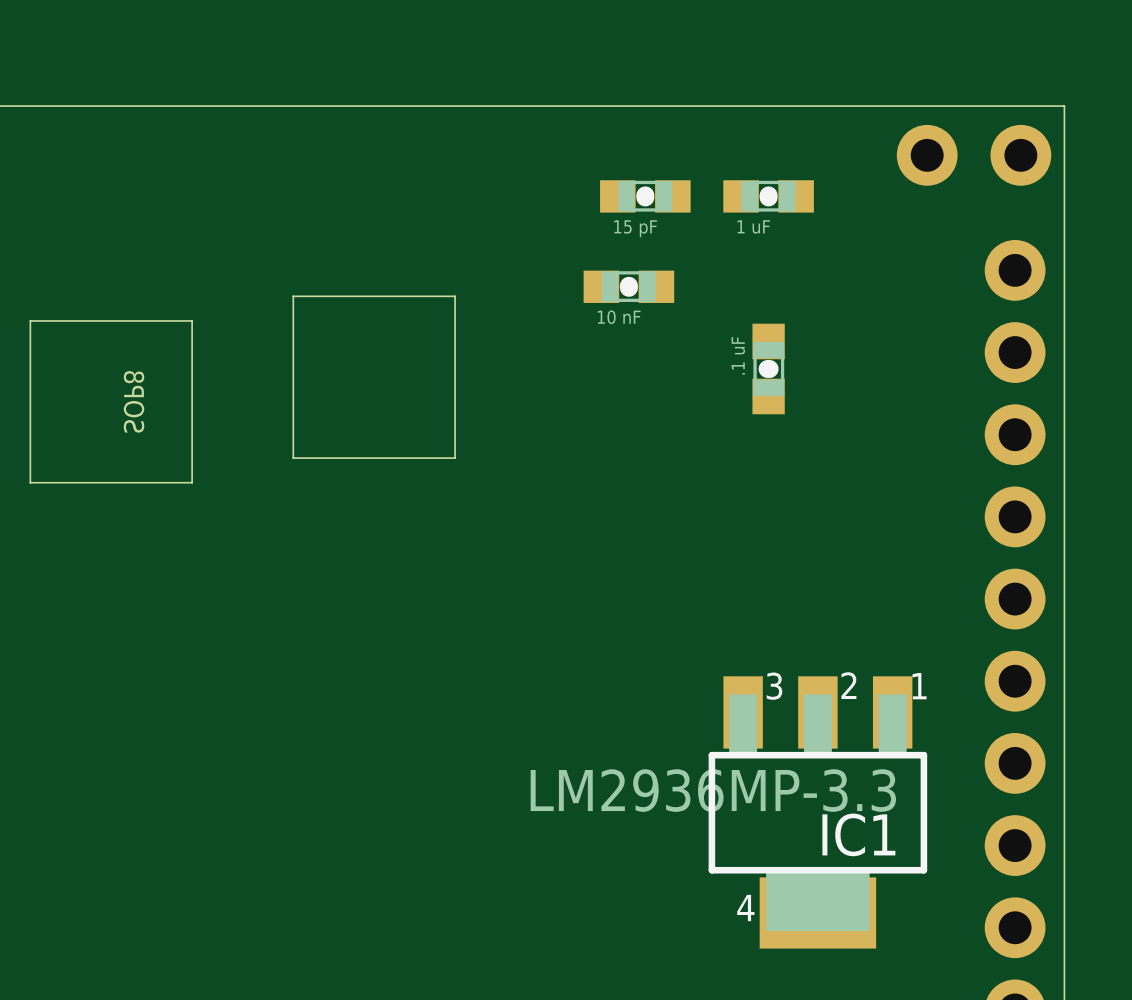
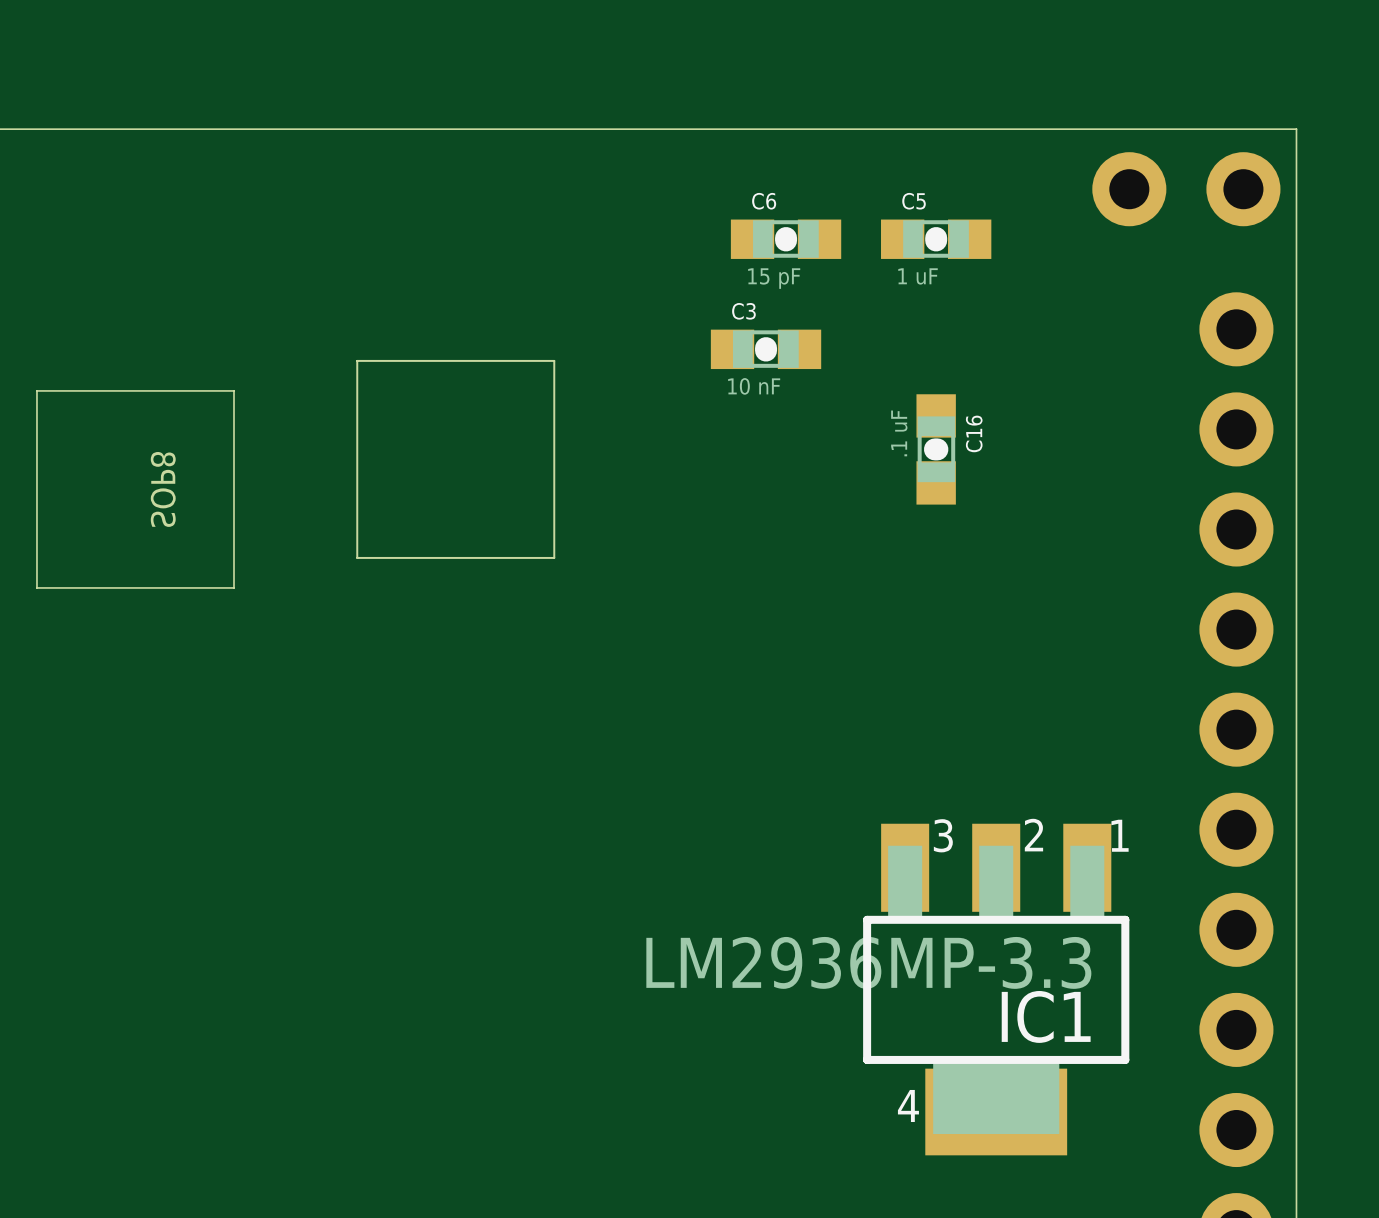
C6 name: none -> C6 (764, 201)
C5 name: none -> C5 (914, 201)
C3 name: none -> C3 (743, 311)
C16 name: none -> C16 (974, 433)

